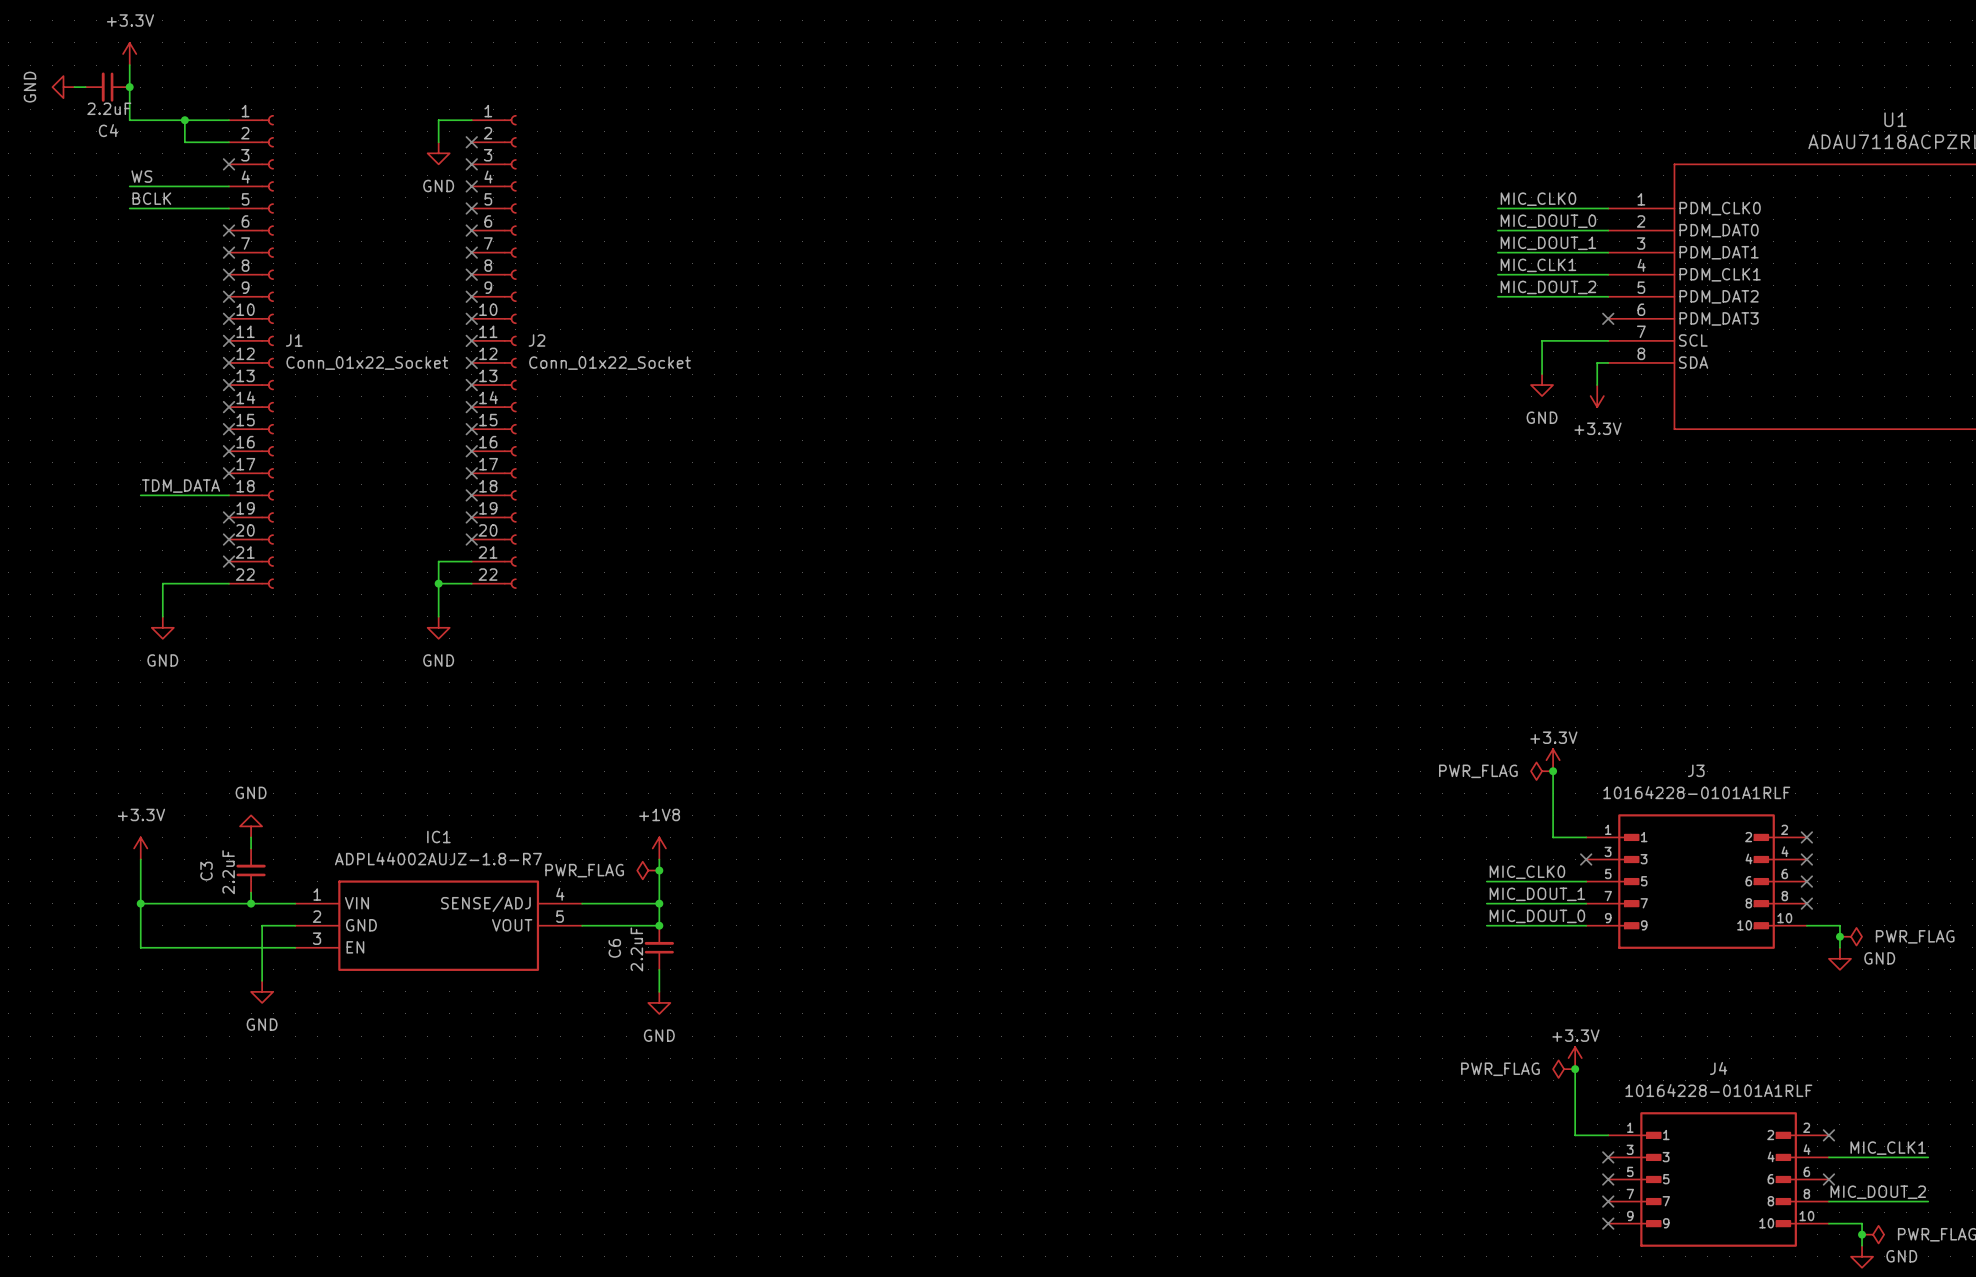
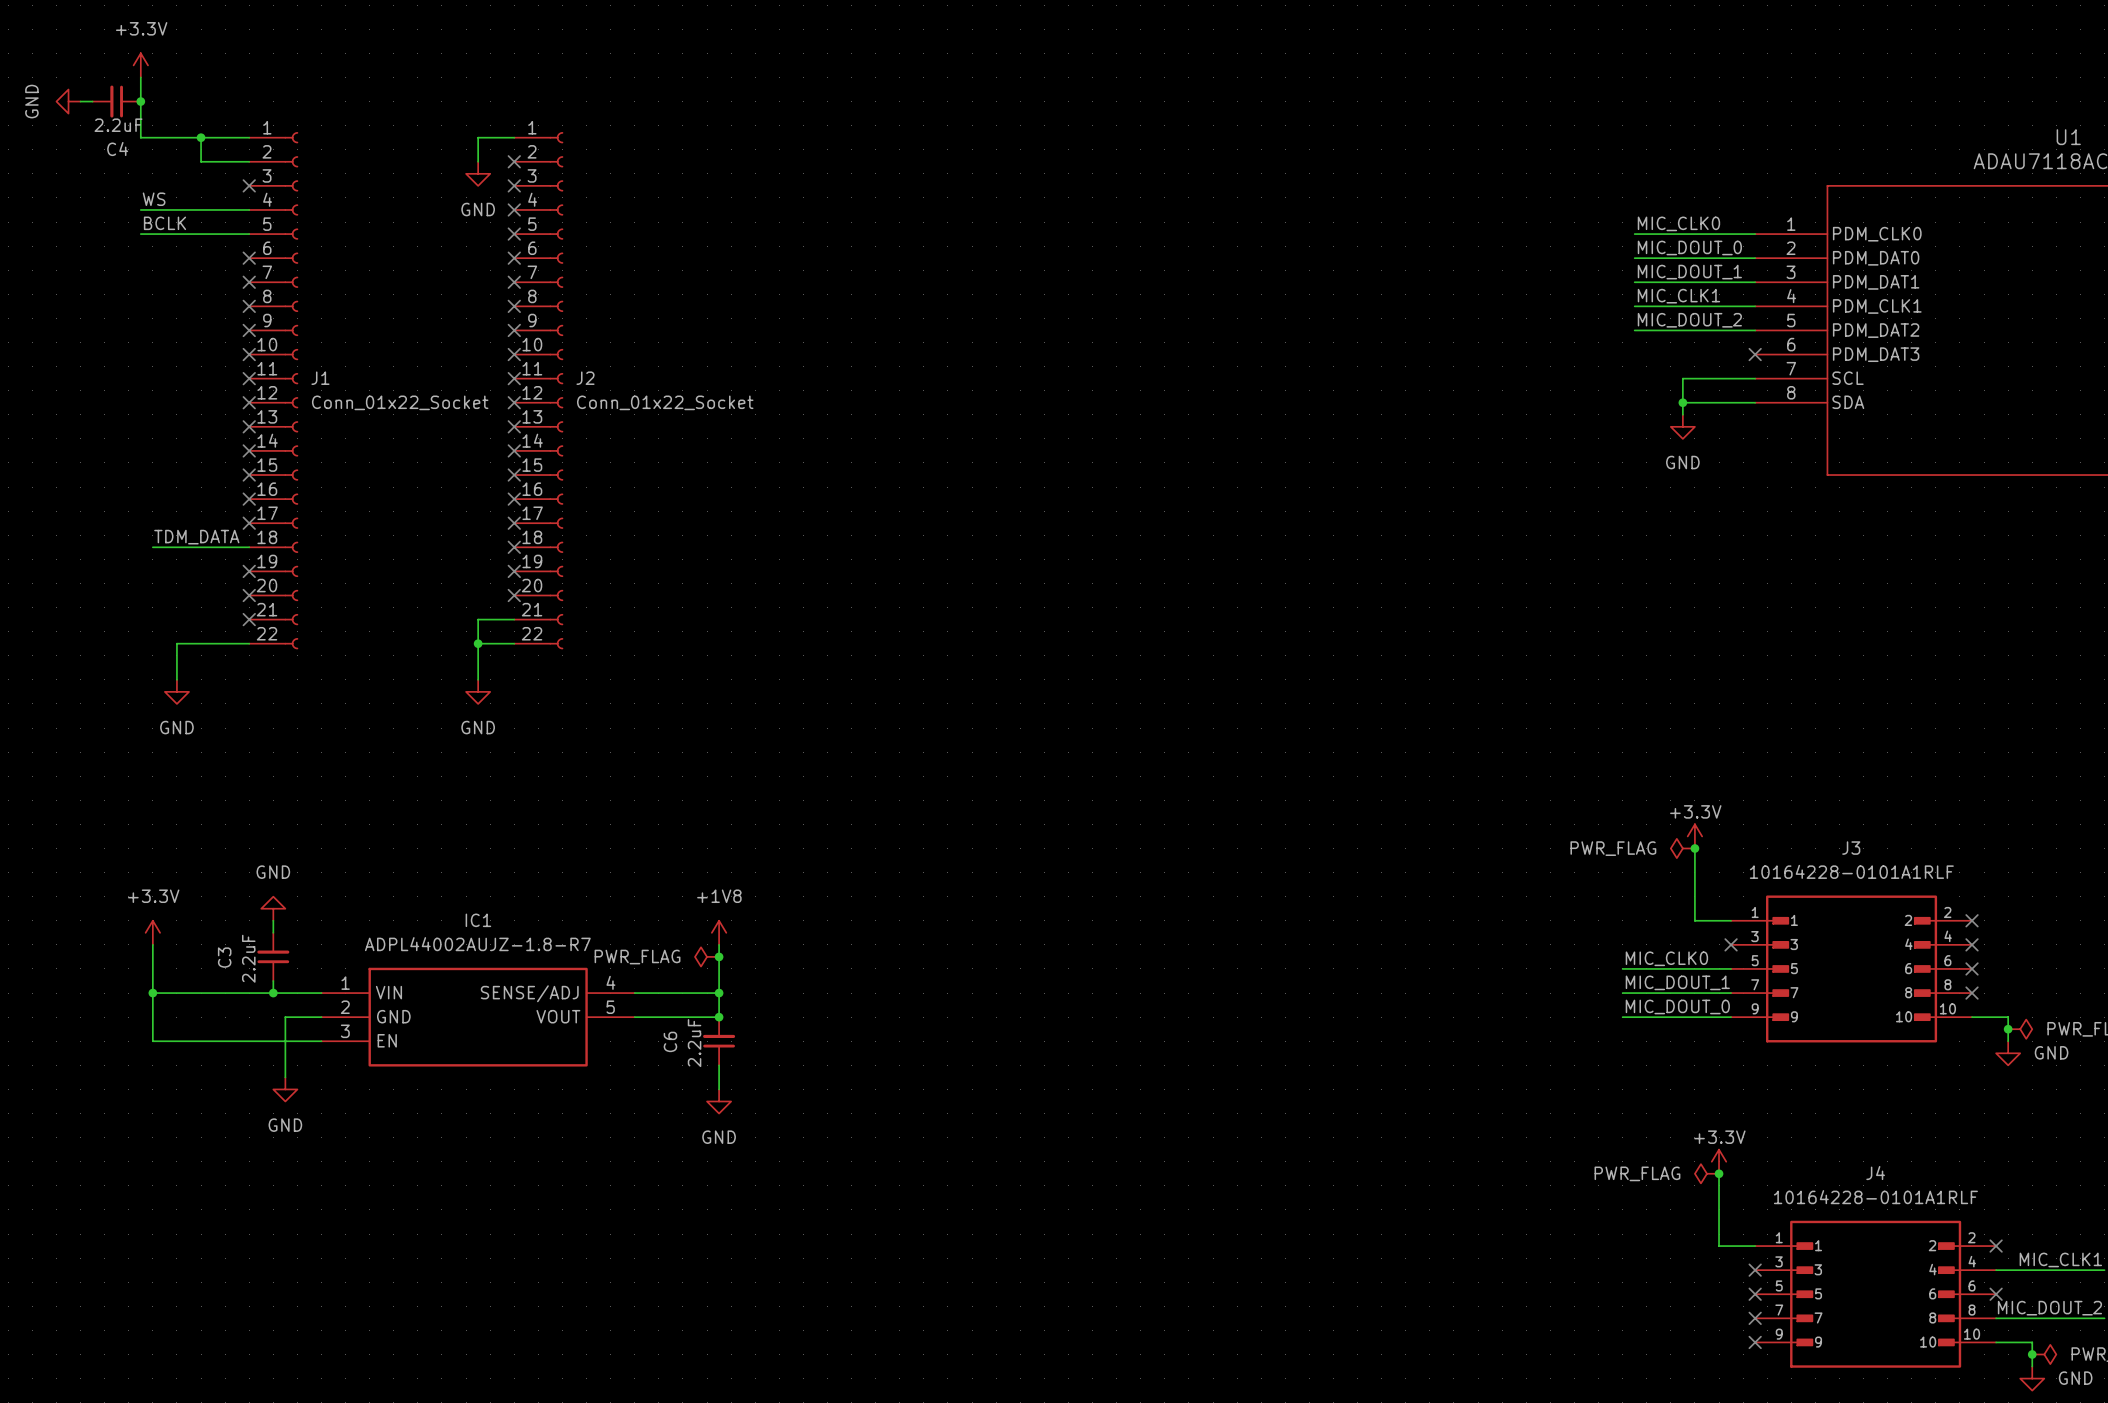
junction: none -> (1682, 402)
wire: (1597, 362) (1597, 385) -> (1743, 402) (1682, 402)
power symbol: +3.3V (1597, 396) -> none

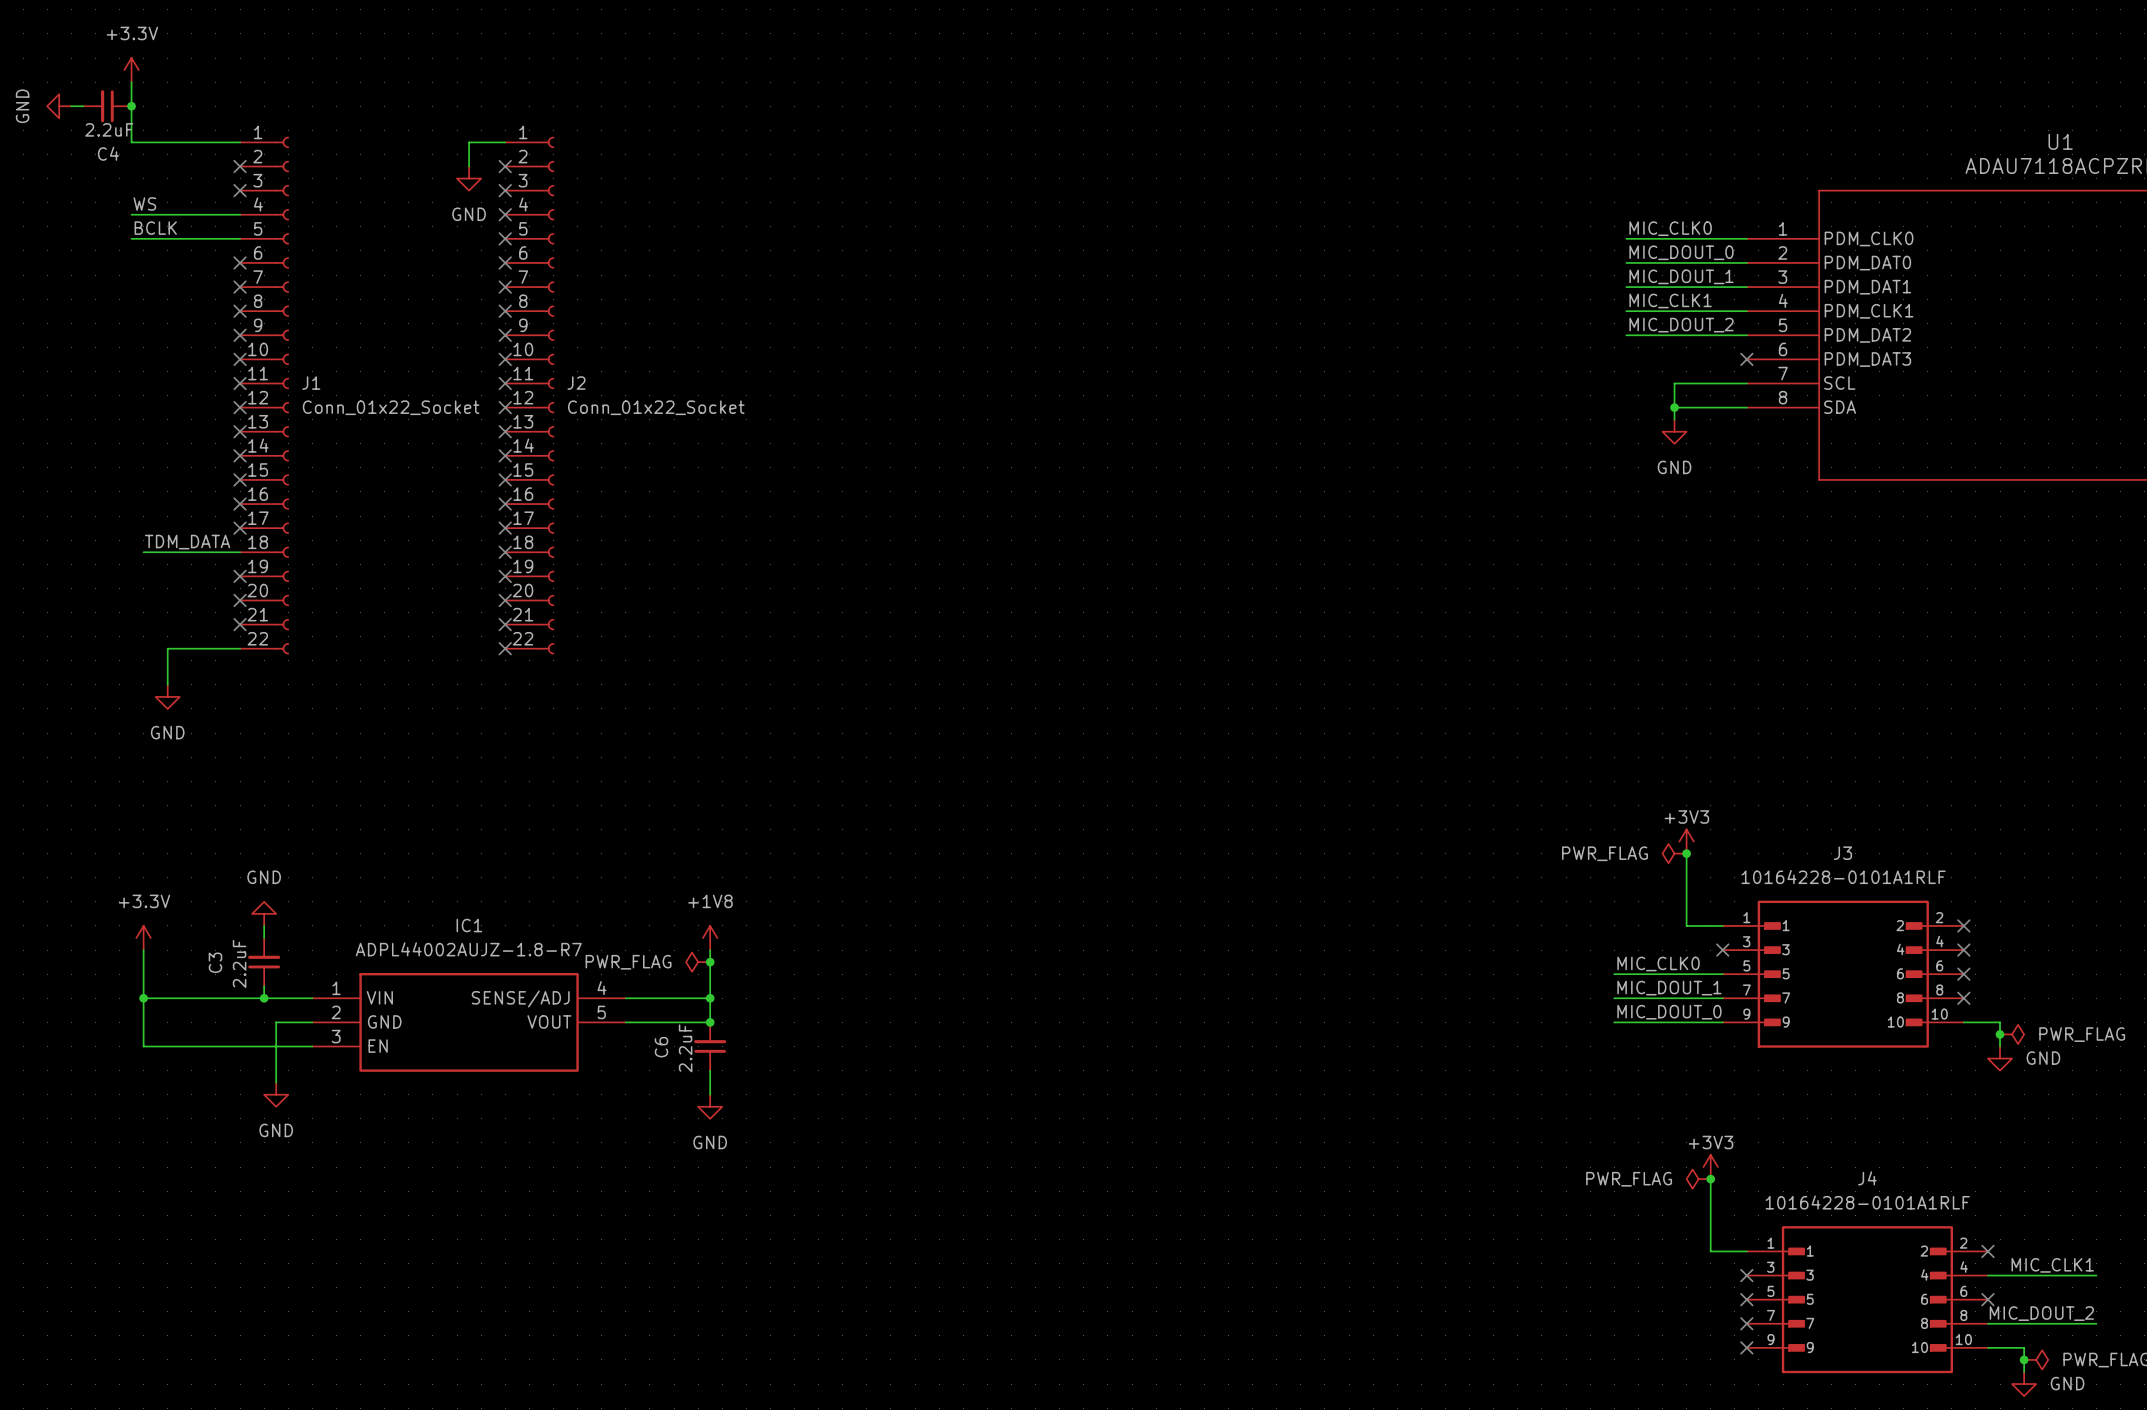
wire: (201, 137) (201, 161) (249, 161) -> none
junction: (201, 137) -> none
no-connect mark: none -> (240, 166)
wire: (514, 619) (478, 619) (478, 679) -> none
no-connect mark: none -> (505, 624)
wire: (478, 643) (514, 643) -> none
junction: (478, 643) -> none
no-connect mark: none -> (505, 648)
power symbol: GND (478, 691) -> none
power symbol: +3.3V (1694, 836) -> +3V3 (1686, 841)
power symbol: +3.3V (1719, 1161) -> +3V3 (1710, 1167)

